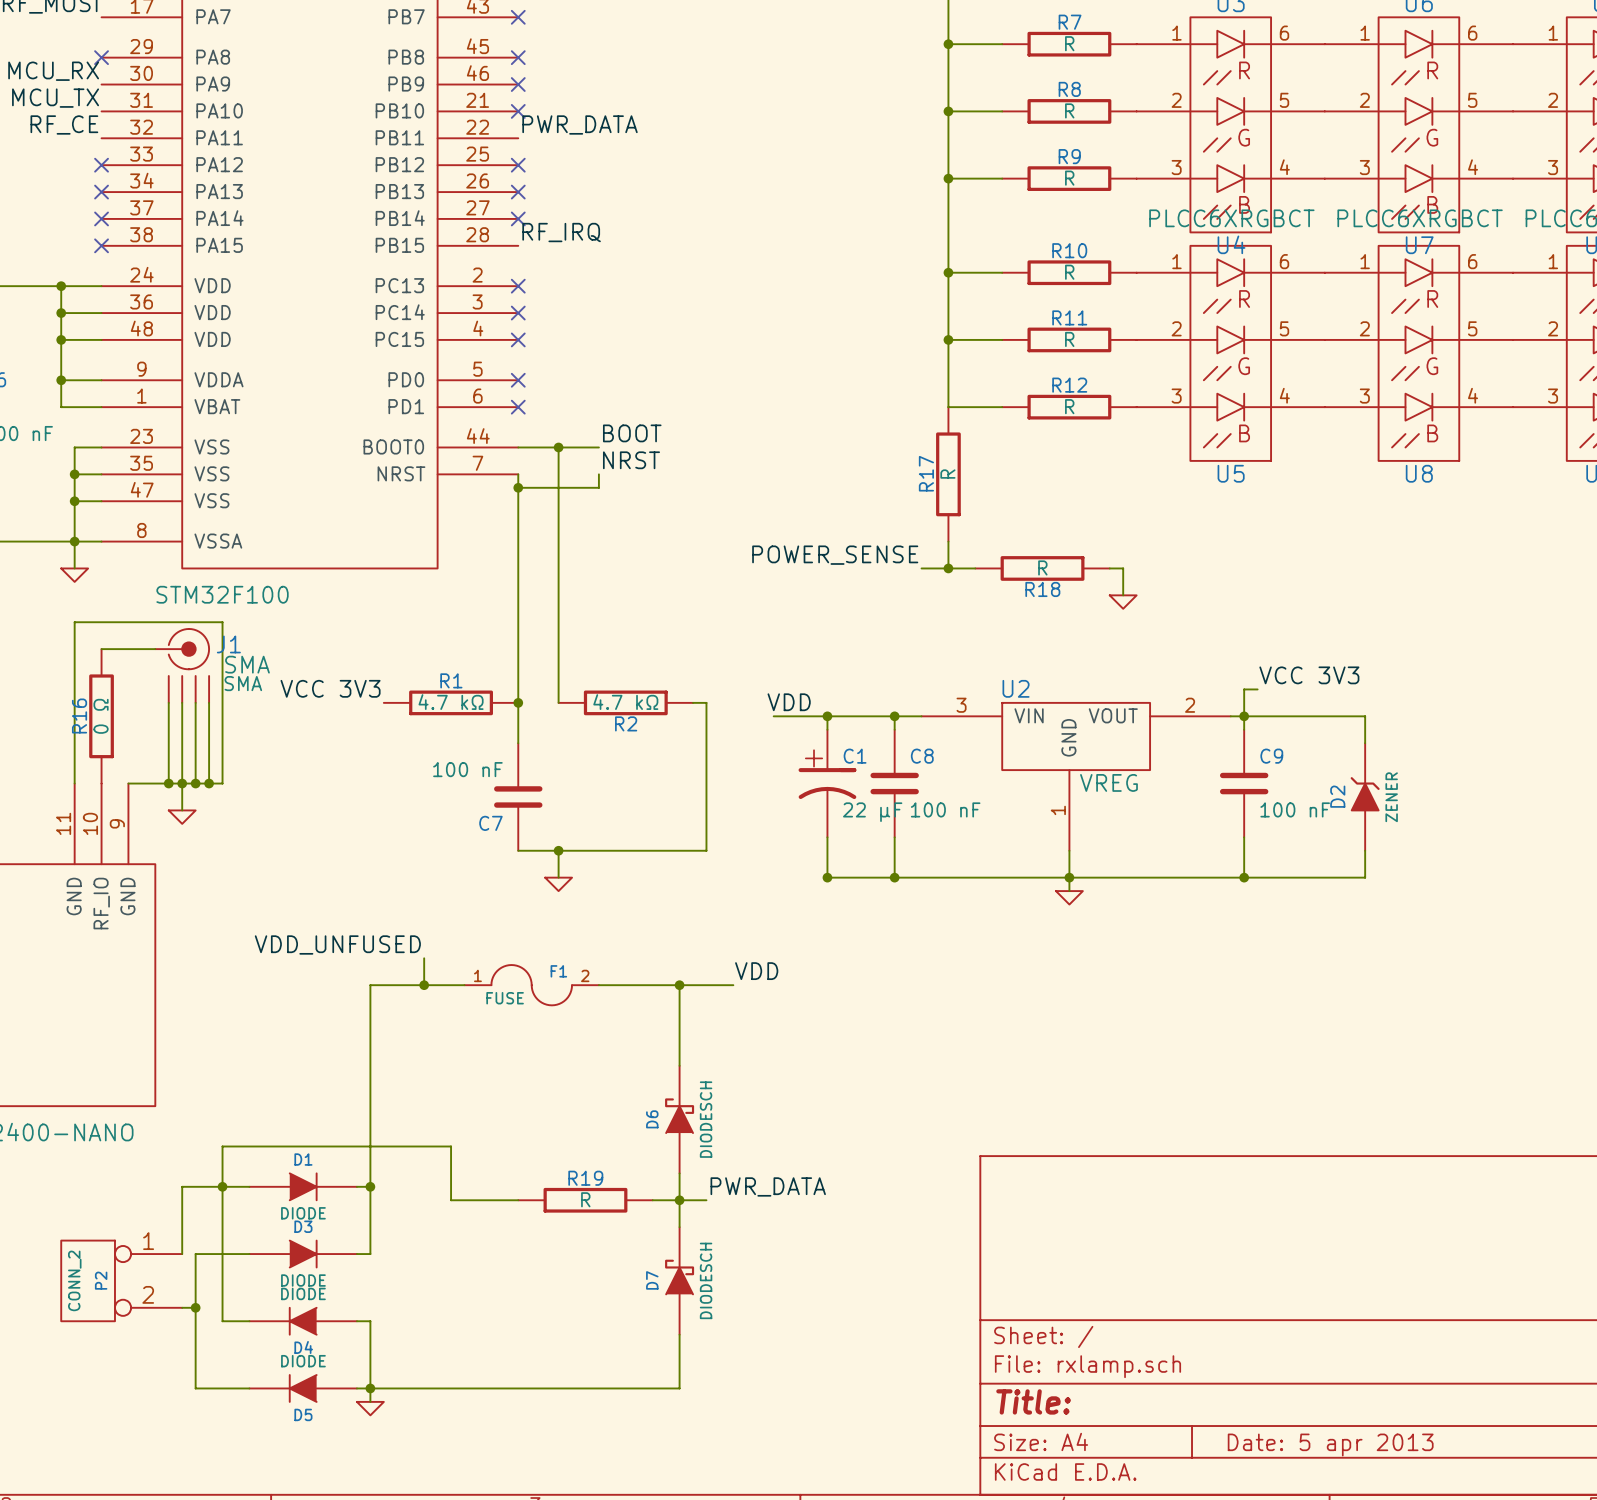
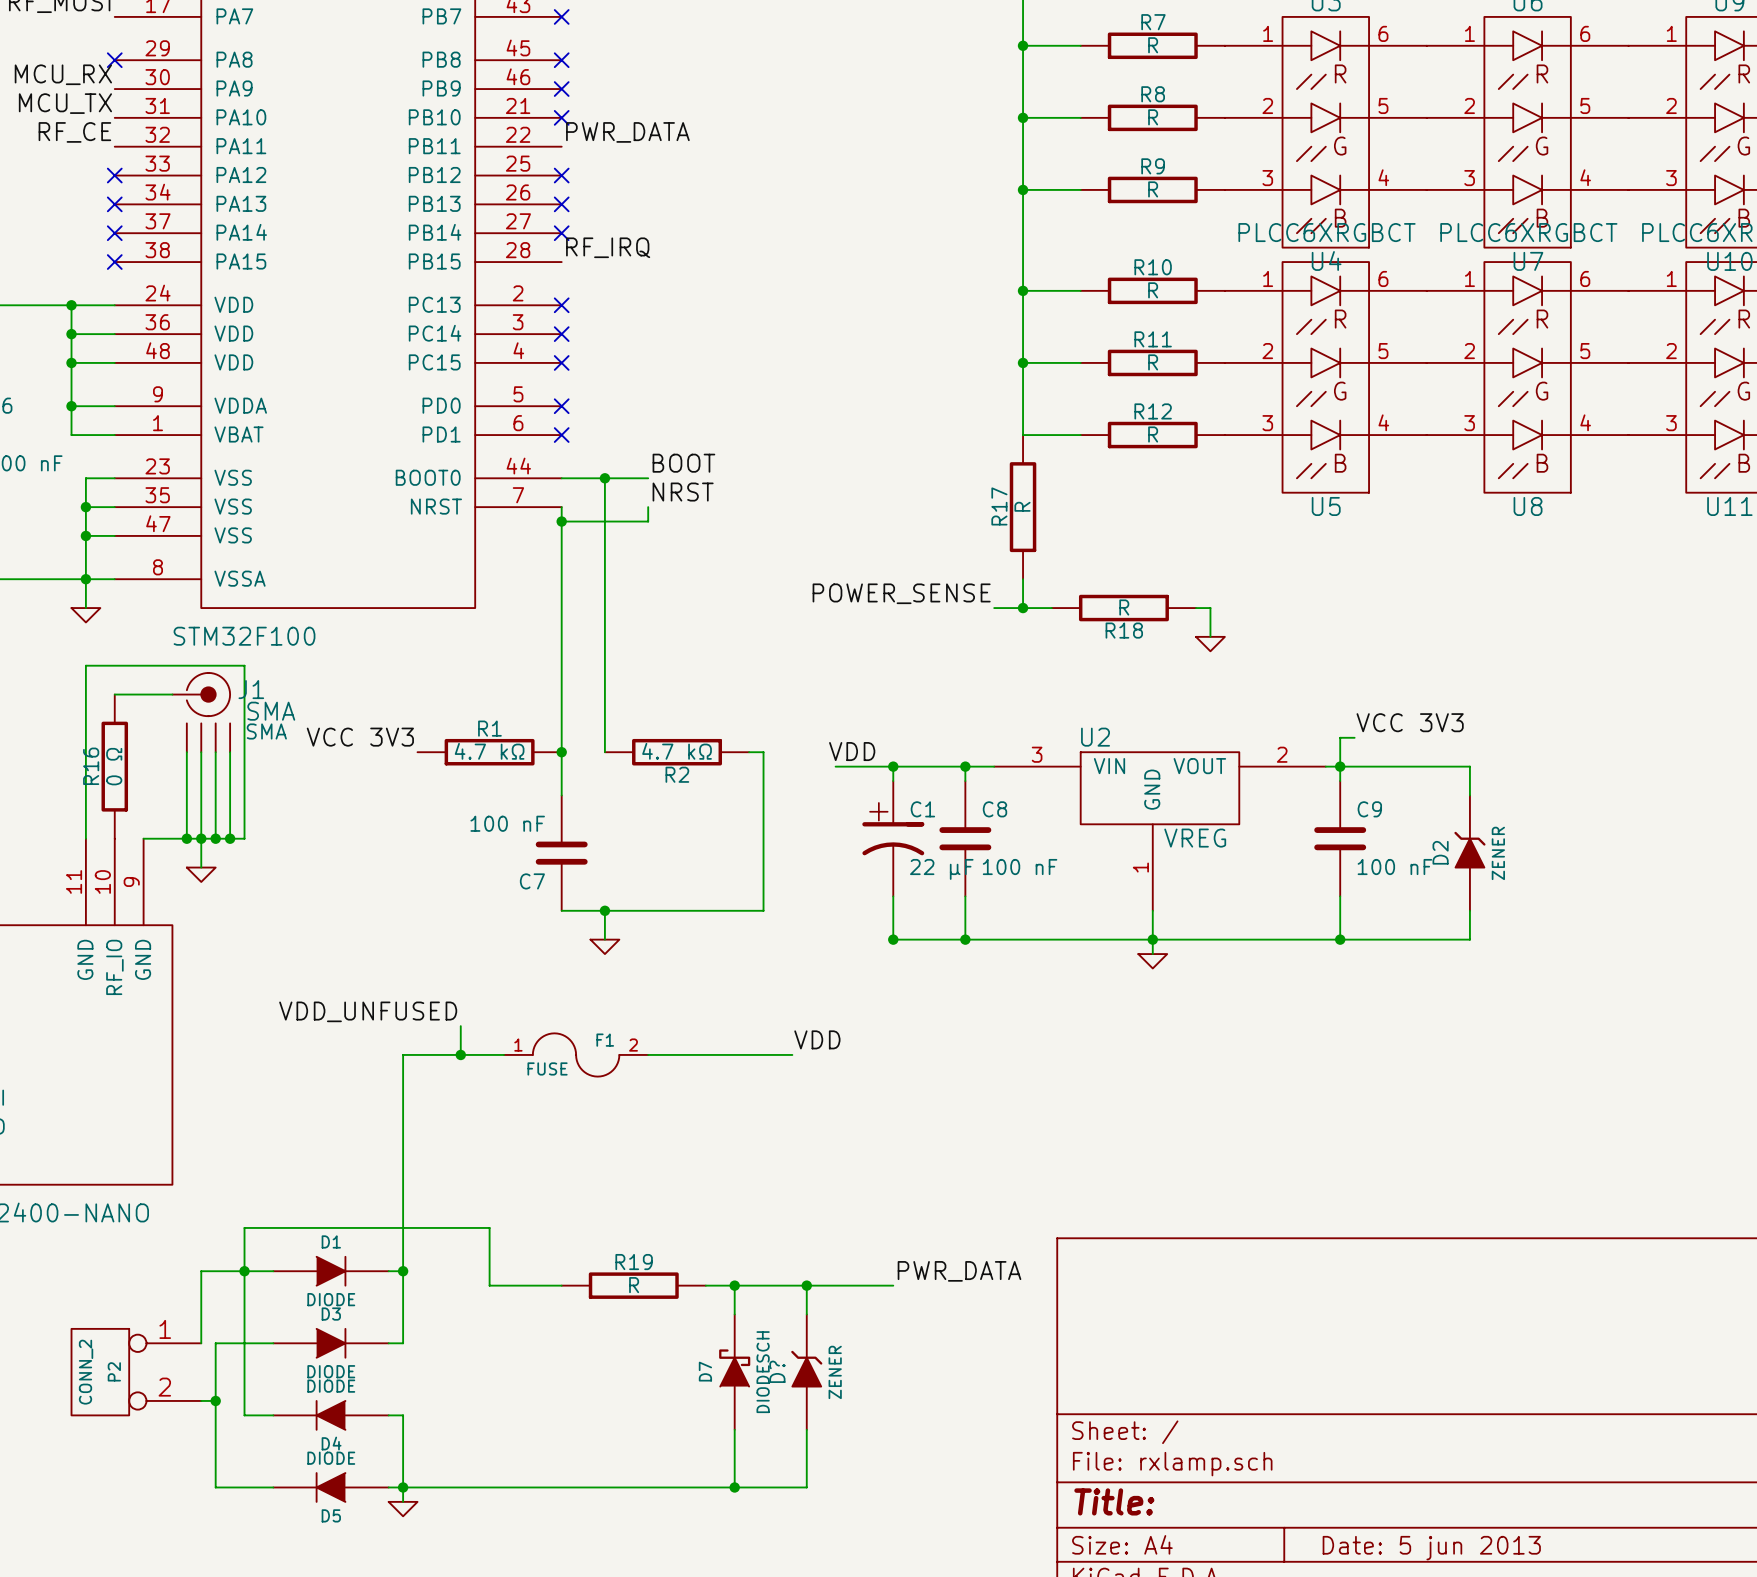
wire: (679, 985) (679, 1065) -> none
junction: (679, 985) -> none
D6: DIODESCH (679, 1119) -> none
wire: (679, 1173) (679, 1200) -> (806, 1285) (806, 1314)
label position: PWR_DATA (768, 1186) -> PWR_DATA (959, 1271)
wire: none -> (763, 1285) (893, 1285)
junction: none -> (806, 1285)
D?: none -> ZENER (806, 1372)
wire: none -> (806, 1429) (806, 1487) (734, 1487)
junction: none -> (734, 1487)
title block: Date: 5 apr 2013 (1330, 1445) -> Date: 5 jun 2013 (1431, 1548)

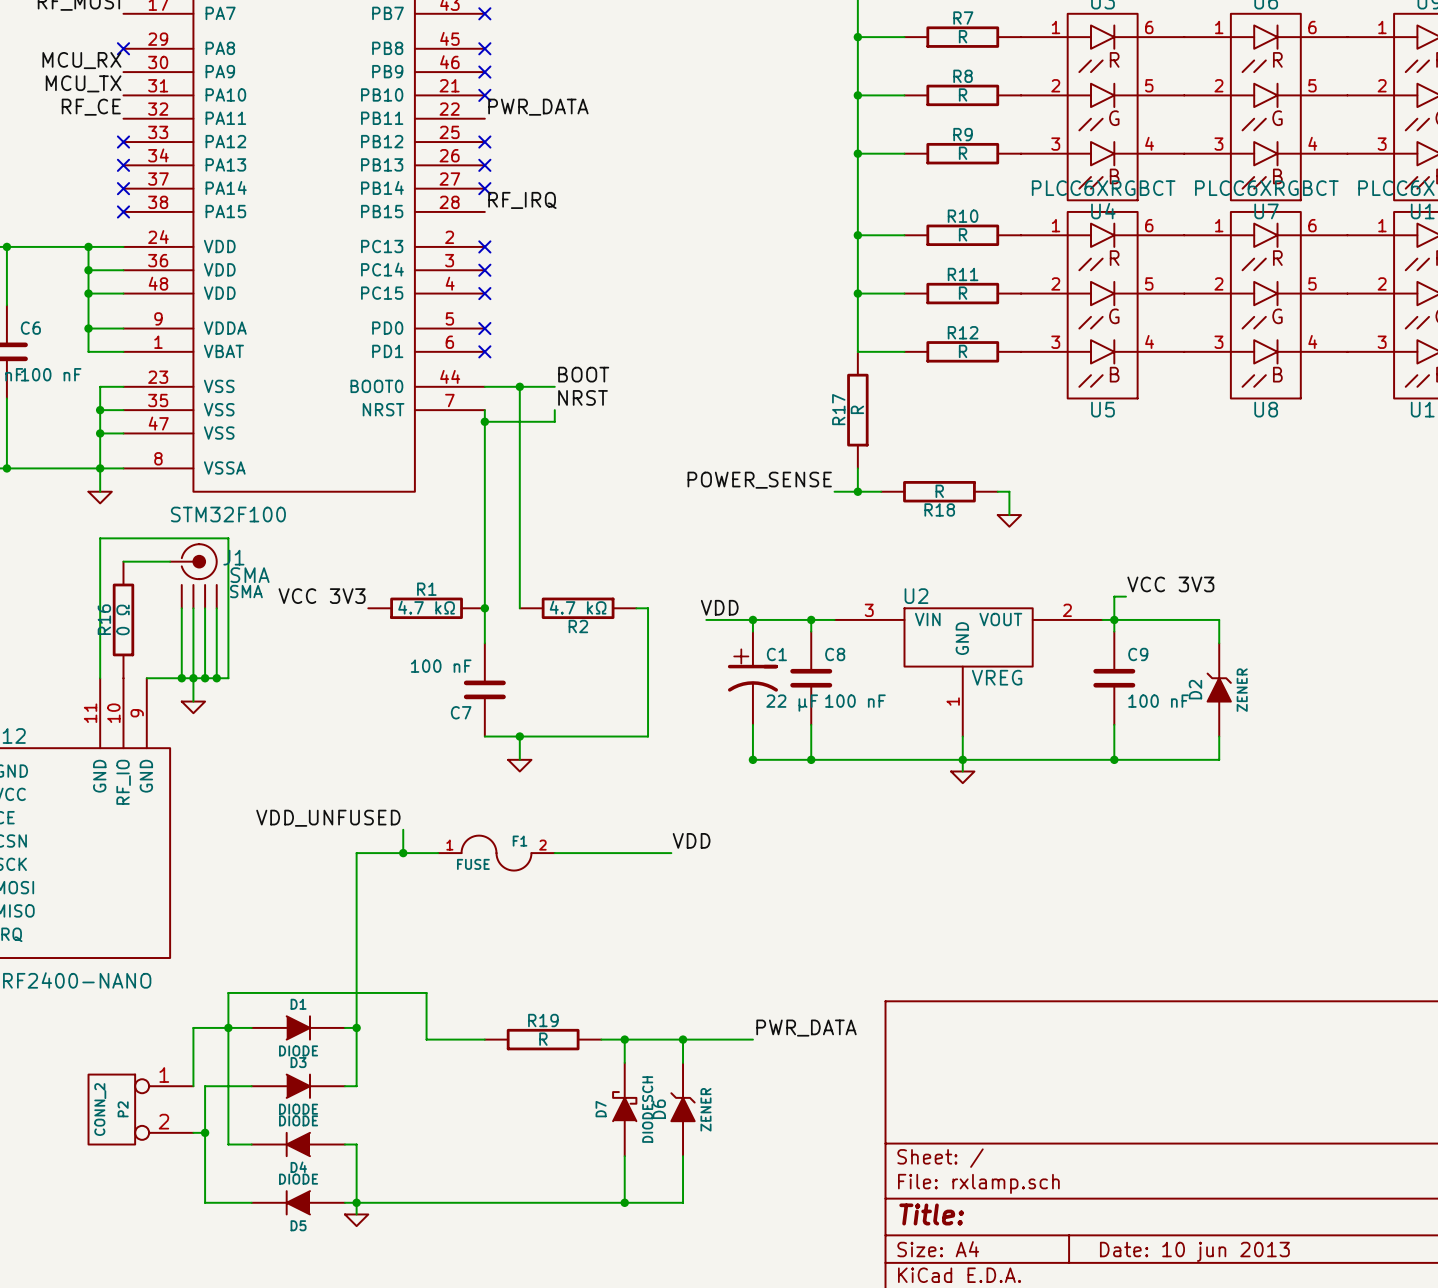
D? name: D? (777, 1371) -> D6 (659, 1109)
title block: Date: 5 jun 2013 (1431, 1548) -> Date: 10 jun 2013 (1194, 1251)

